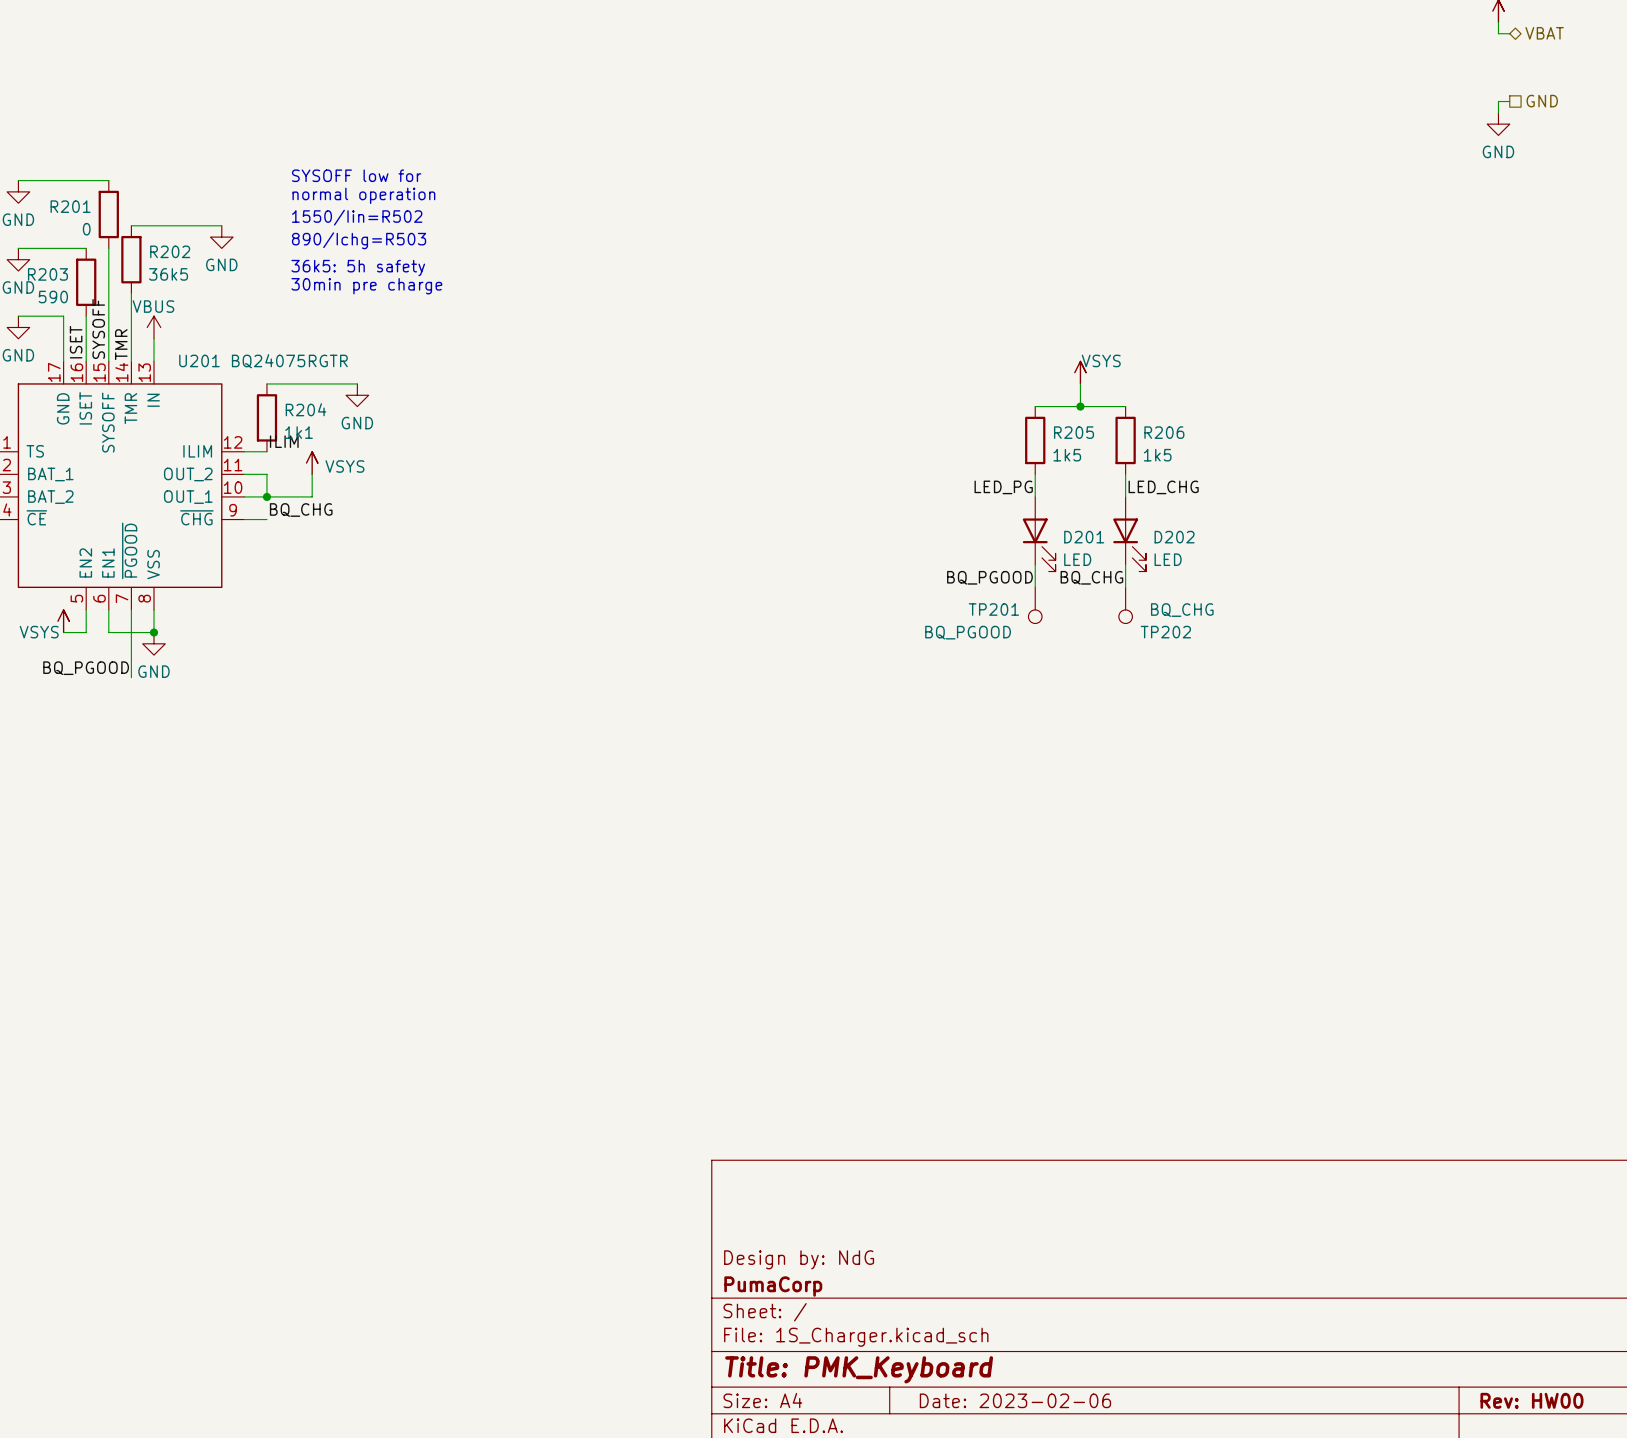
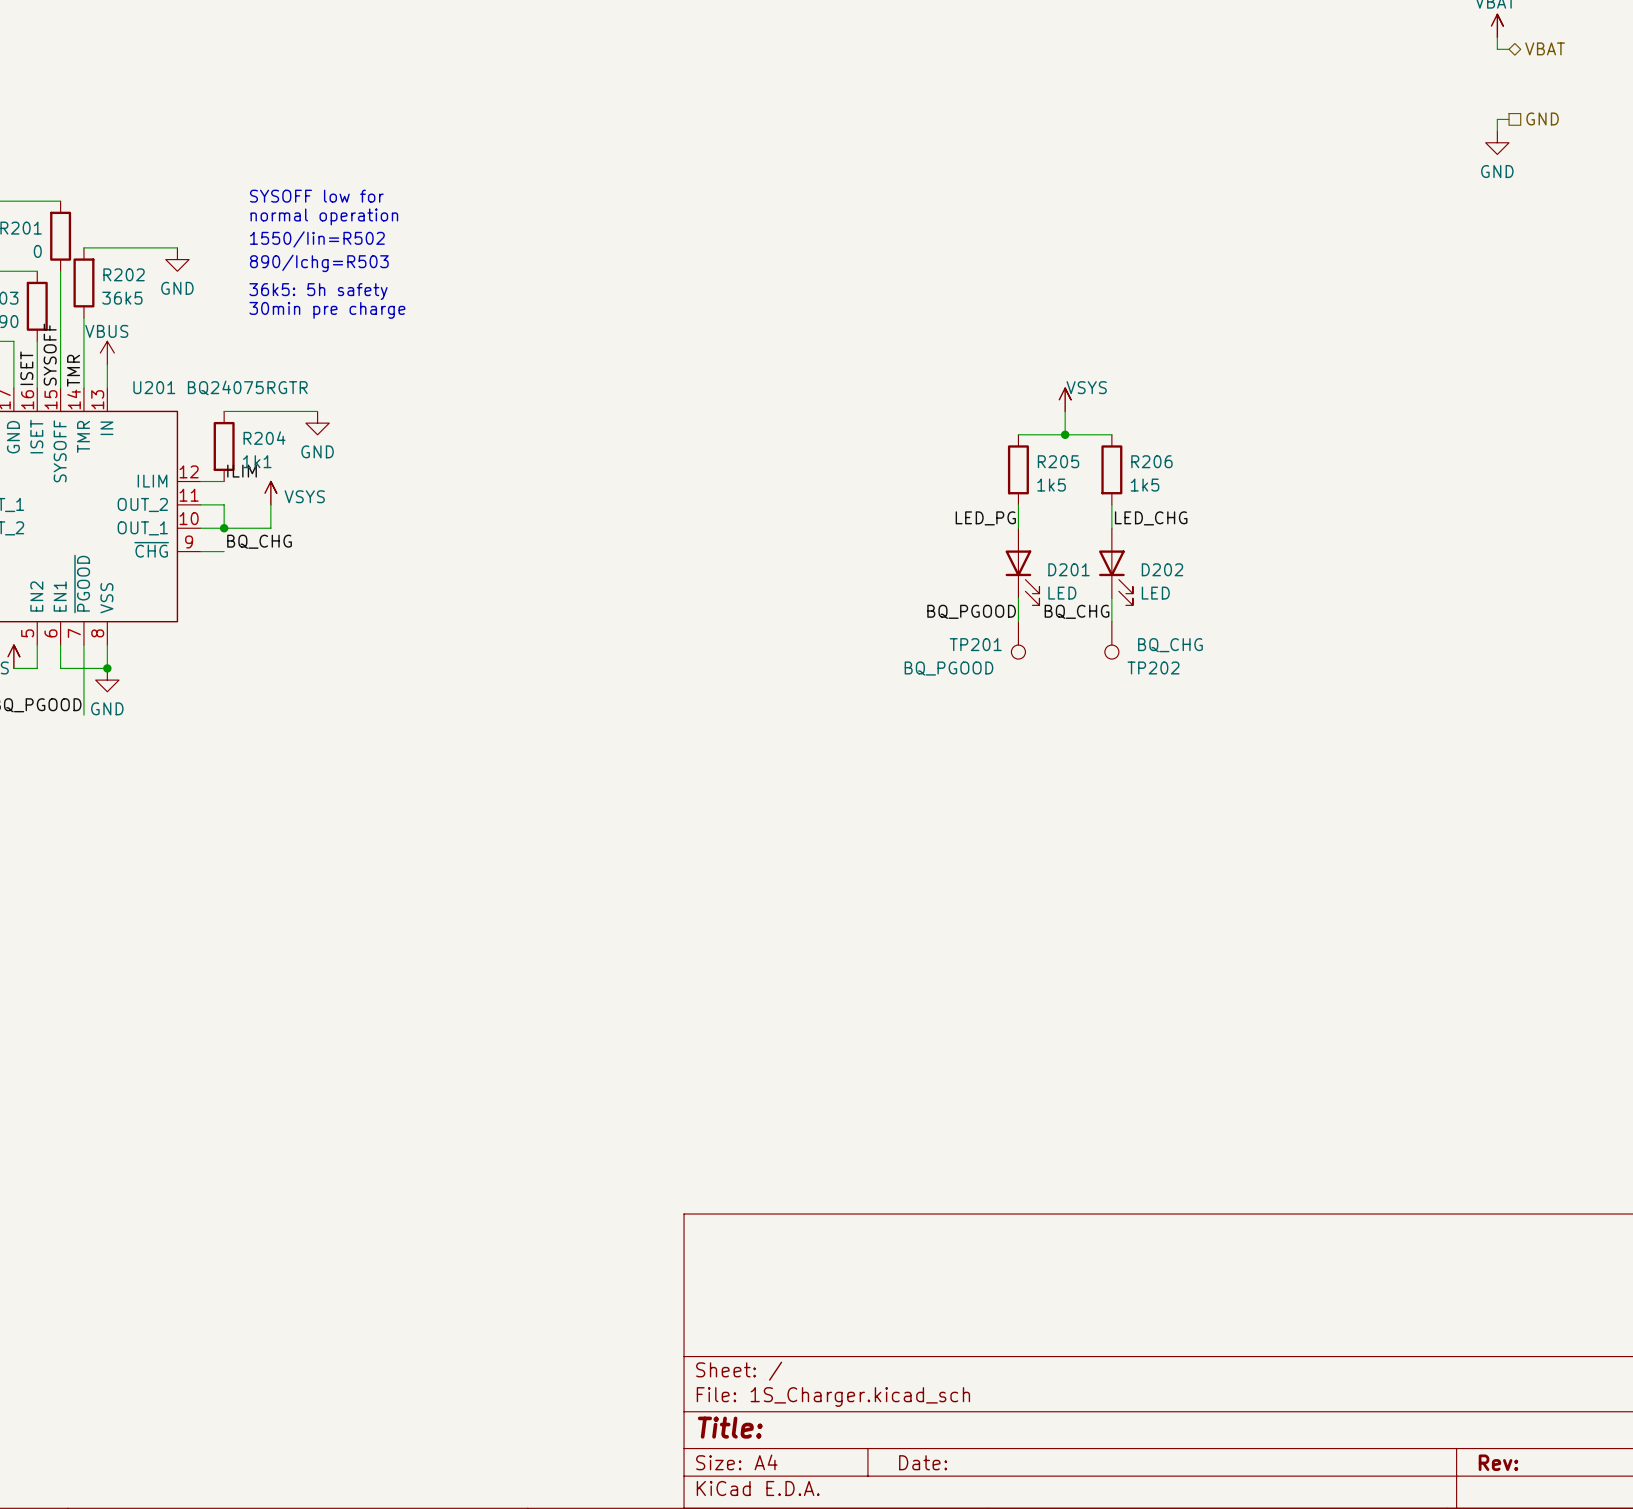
title block: Design by: NdG (799, 1259) -> none
title block: PumaCorp (773, 1286) -> none
title block: Title: PMK_Keyboard (859, 1369) -> Title: (730, 1427)
title block: Date: 2023-02-06 (1015, 1400) -> Date: (923, 1462)
title block: Rev: HW00 (1531, 1400) -> Rev: (1498, 1462)

